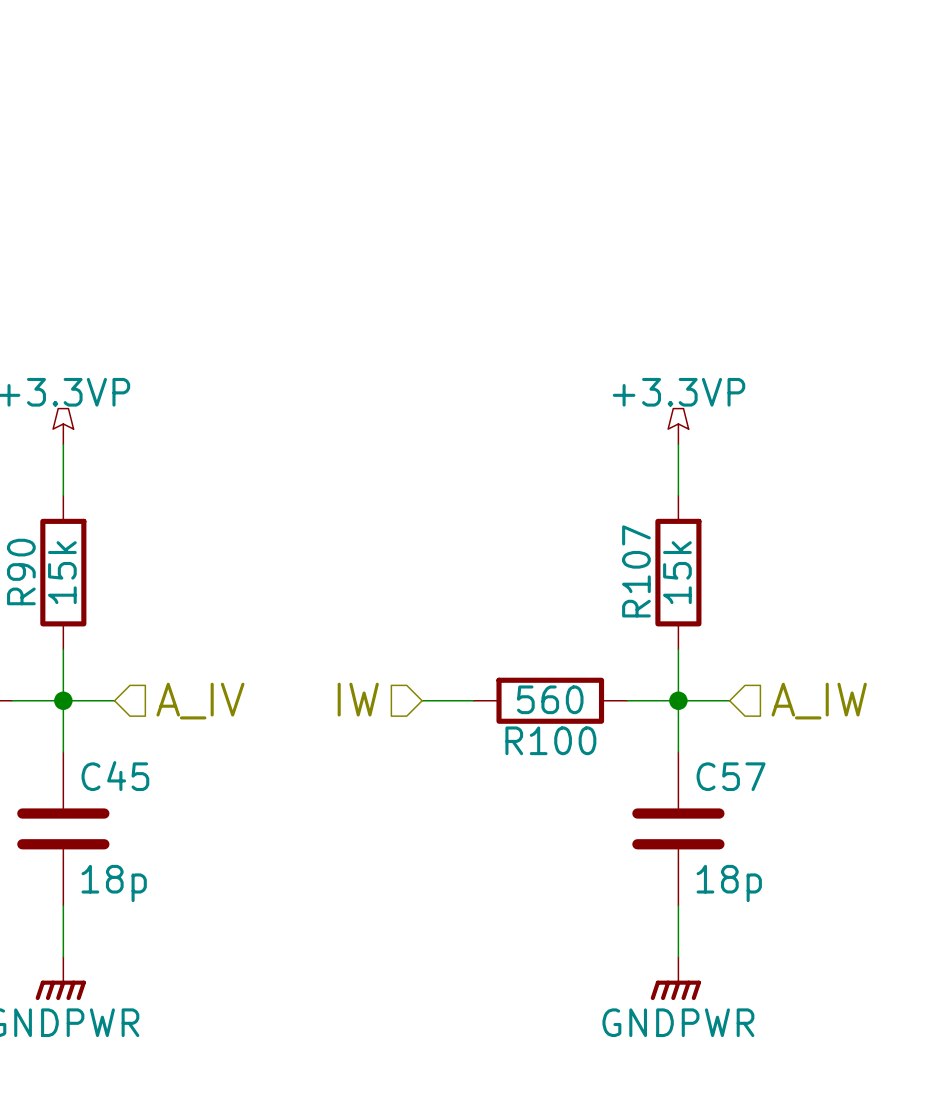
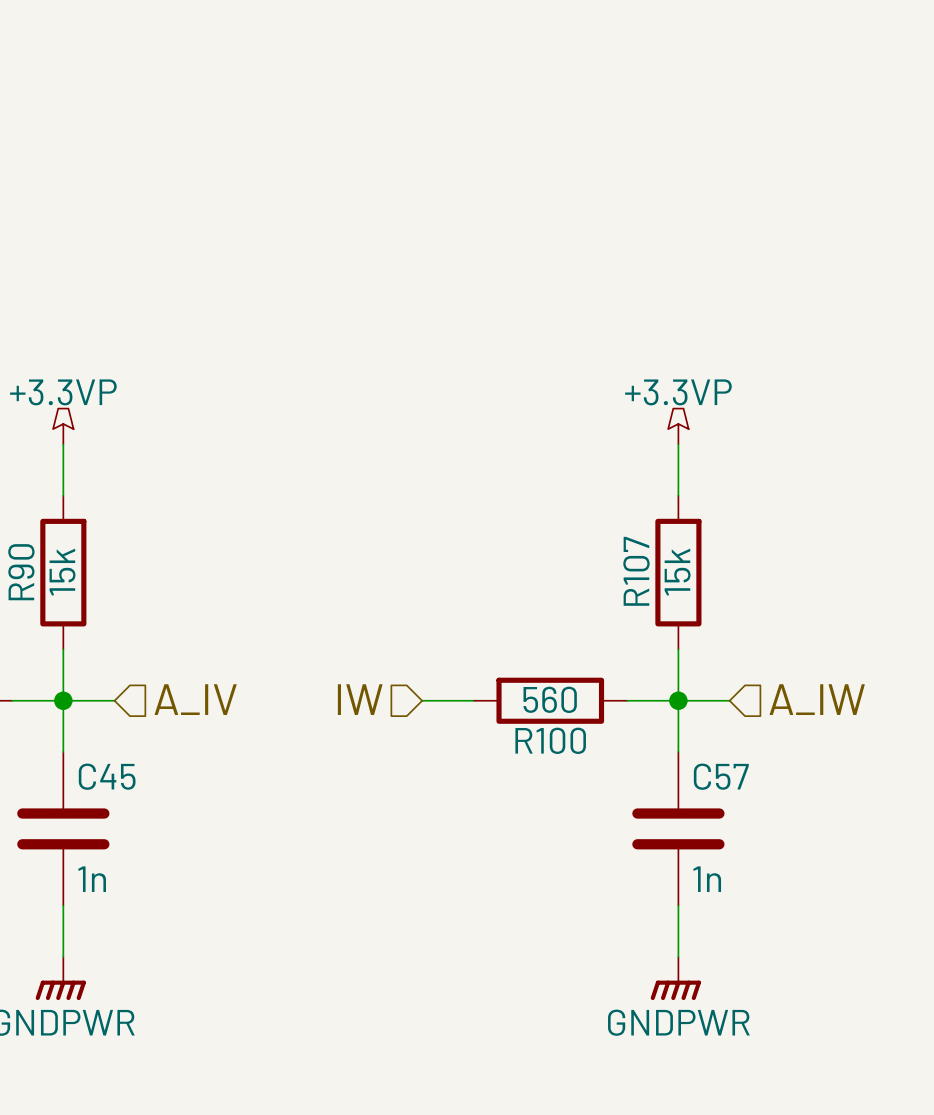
C45 value: 18p (114, 883) -> 1n (92, 879)
C57 value: 18p (729, 883) -> 1n (707, 879)

